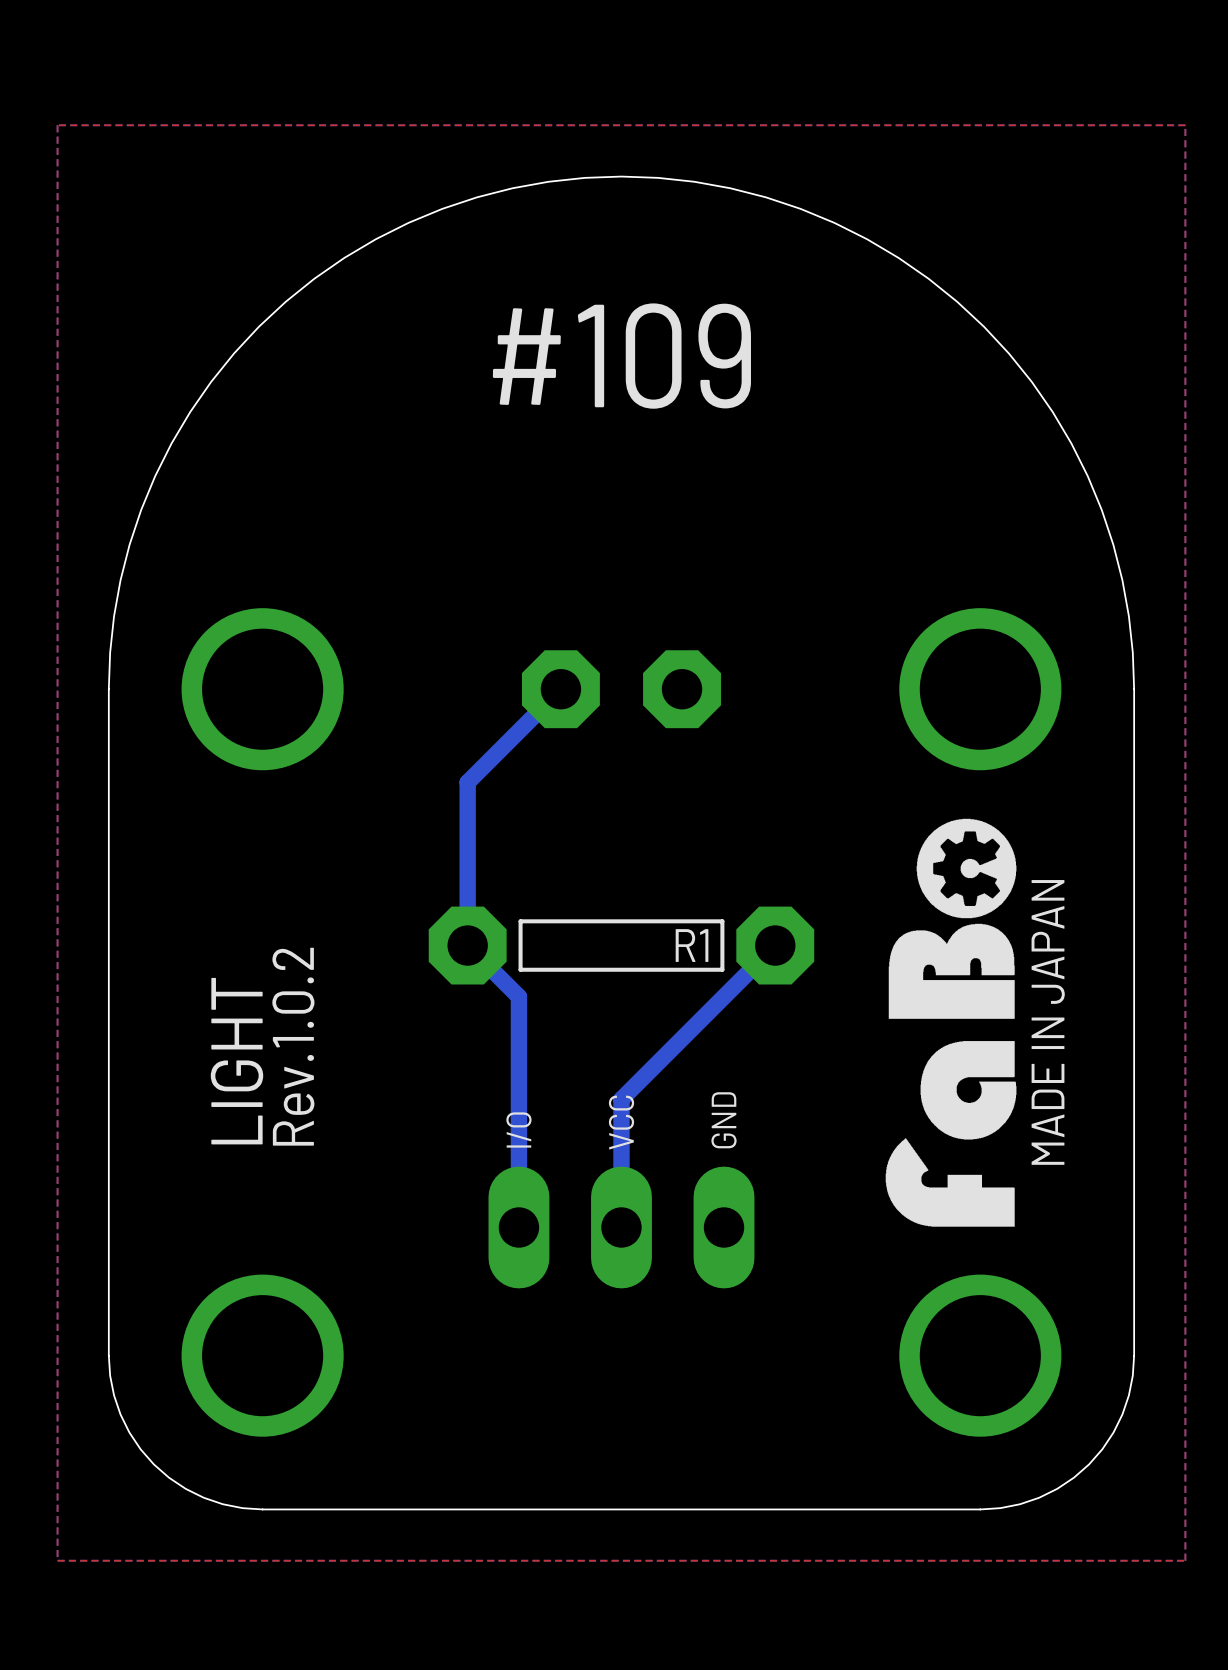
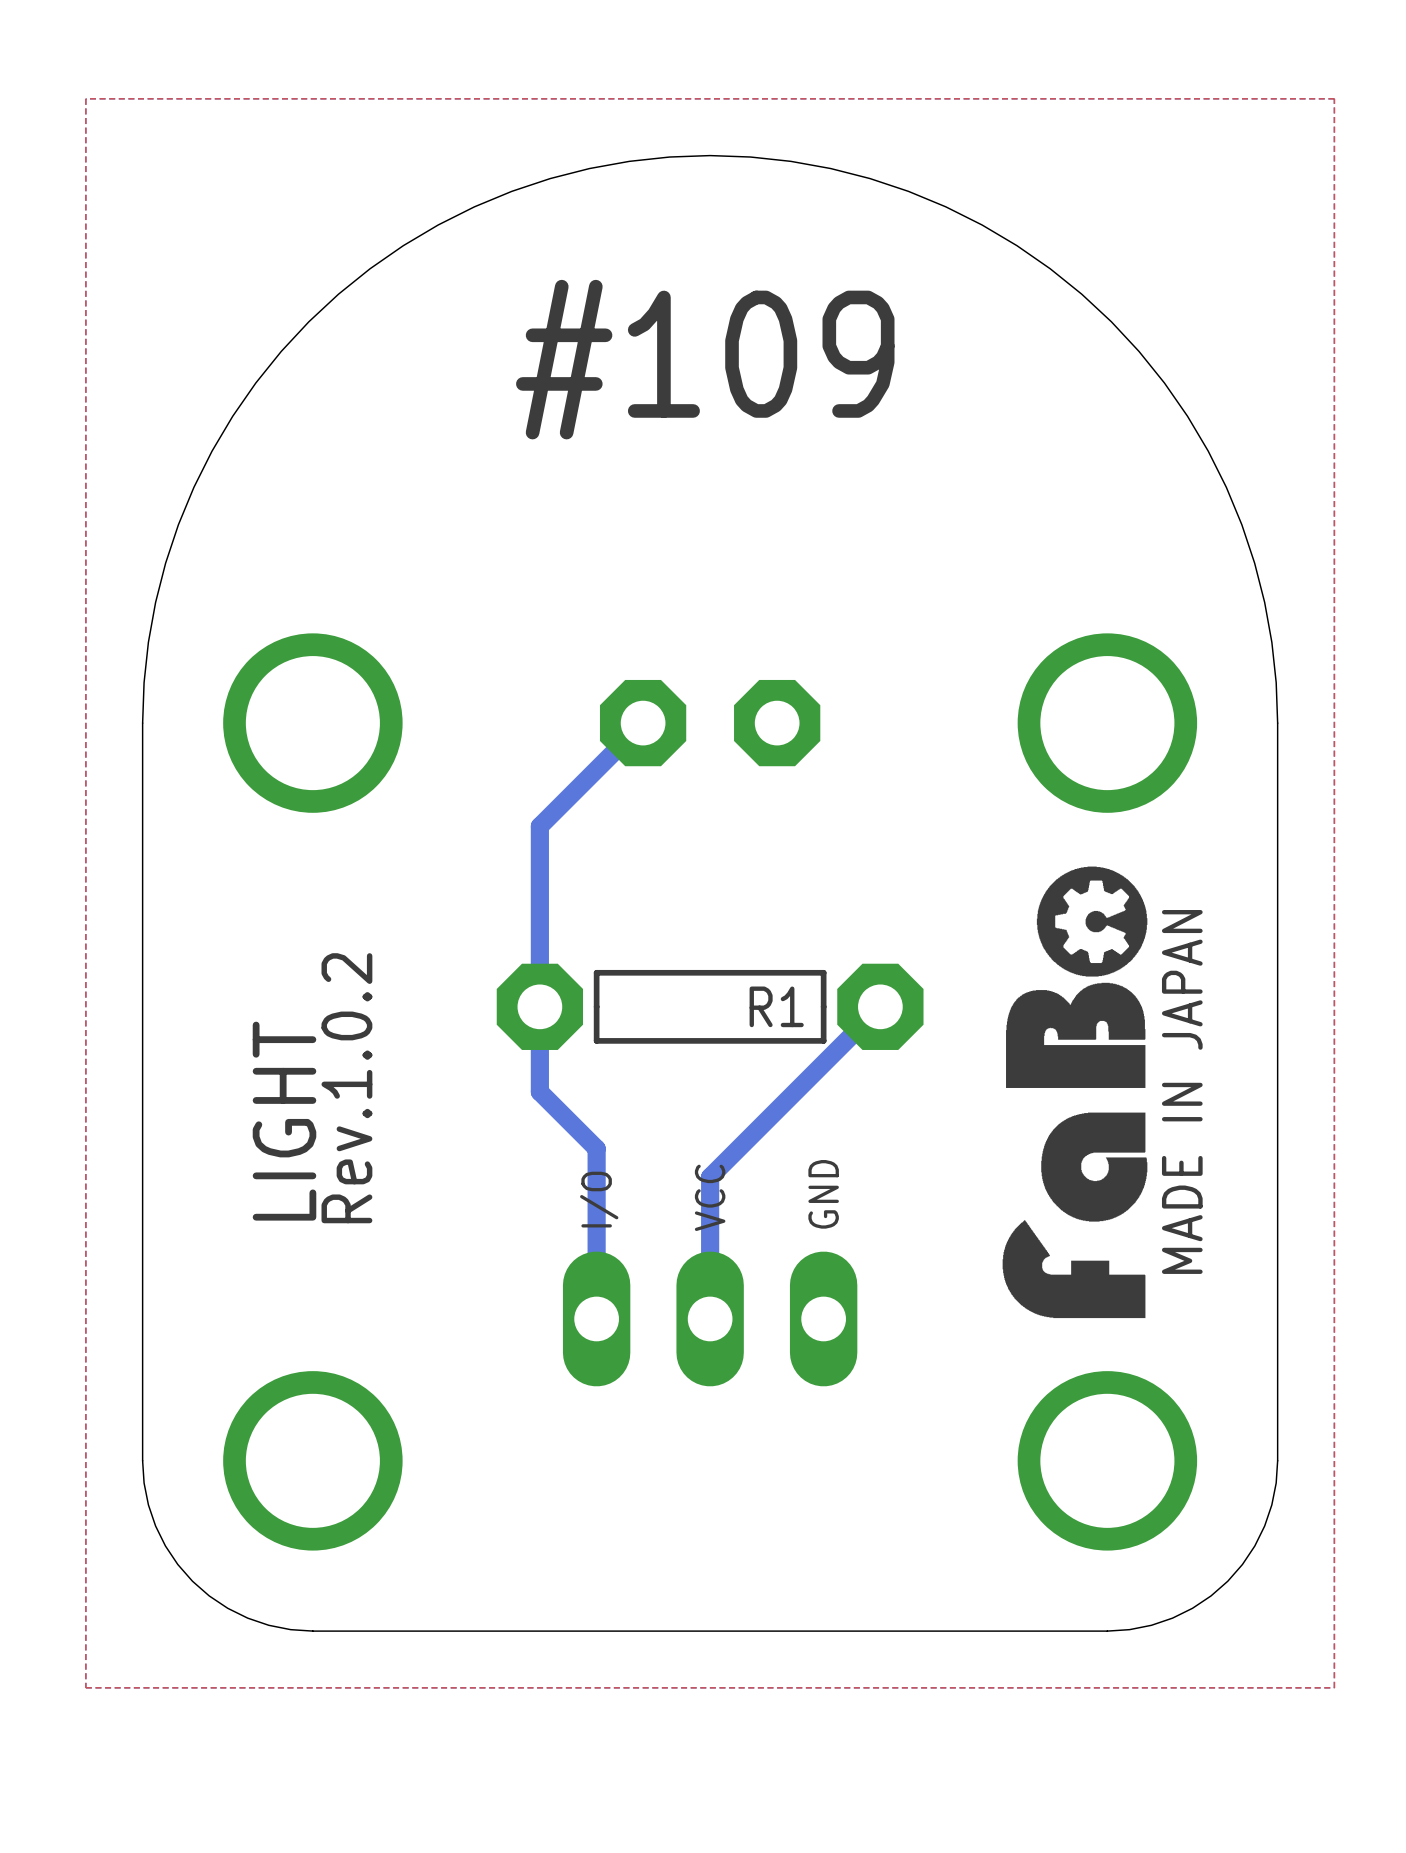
R1 footprint: [428, 906, 815, 985] -> [496, 963, 924, 1050]
bottom track: (467, 945) (518, 996) (518, 1073) -> (539, 1006) (539, 1091) (596, 1148)

